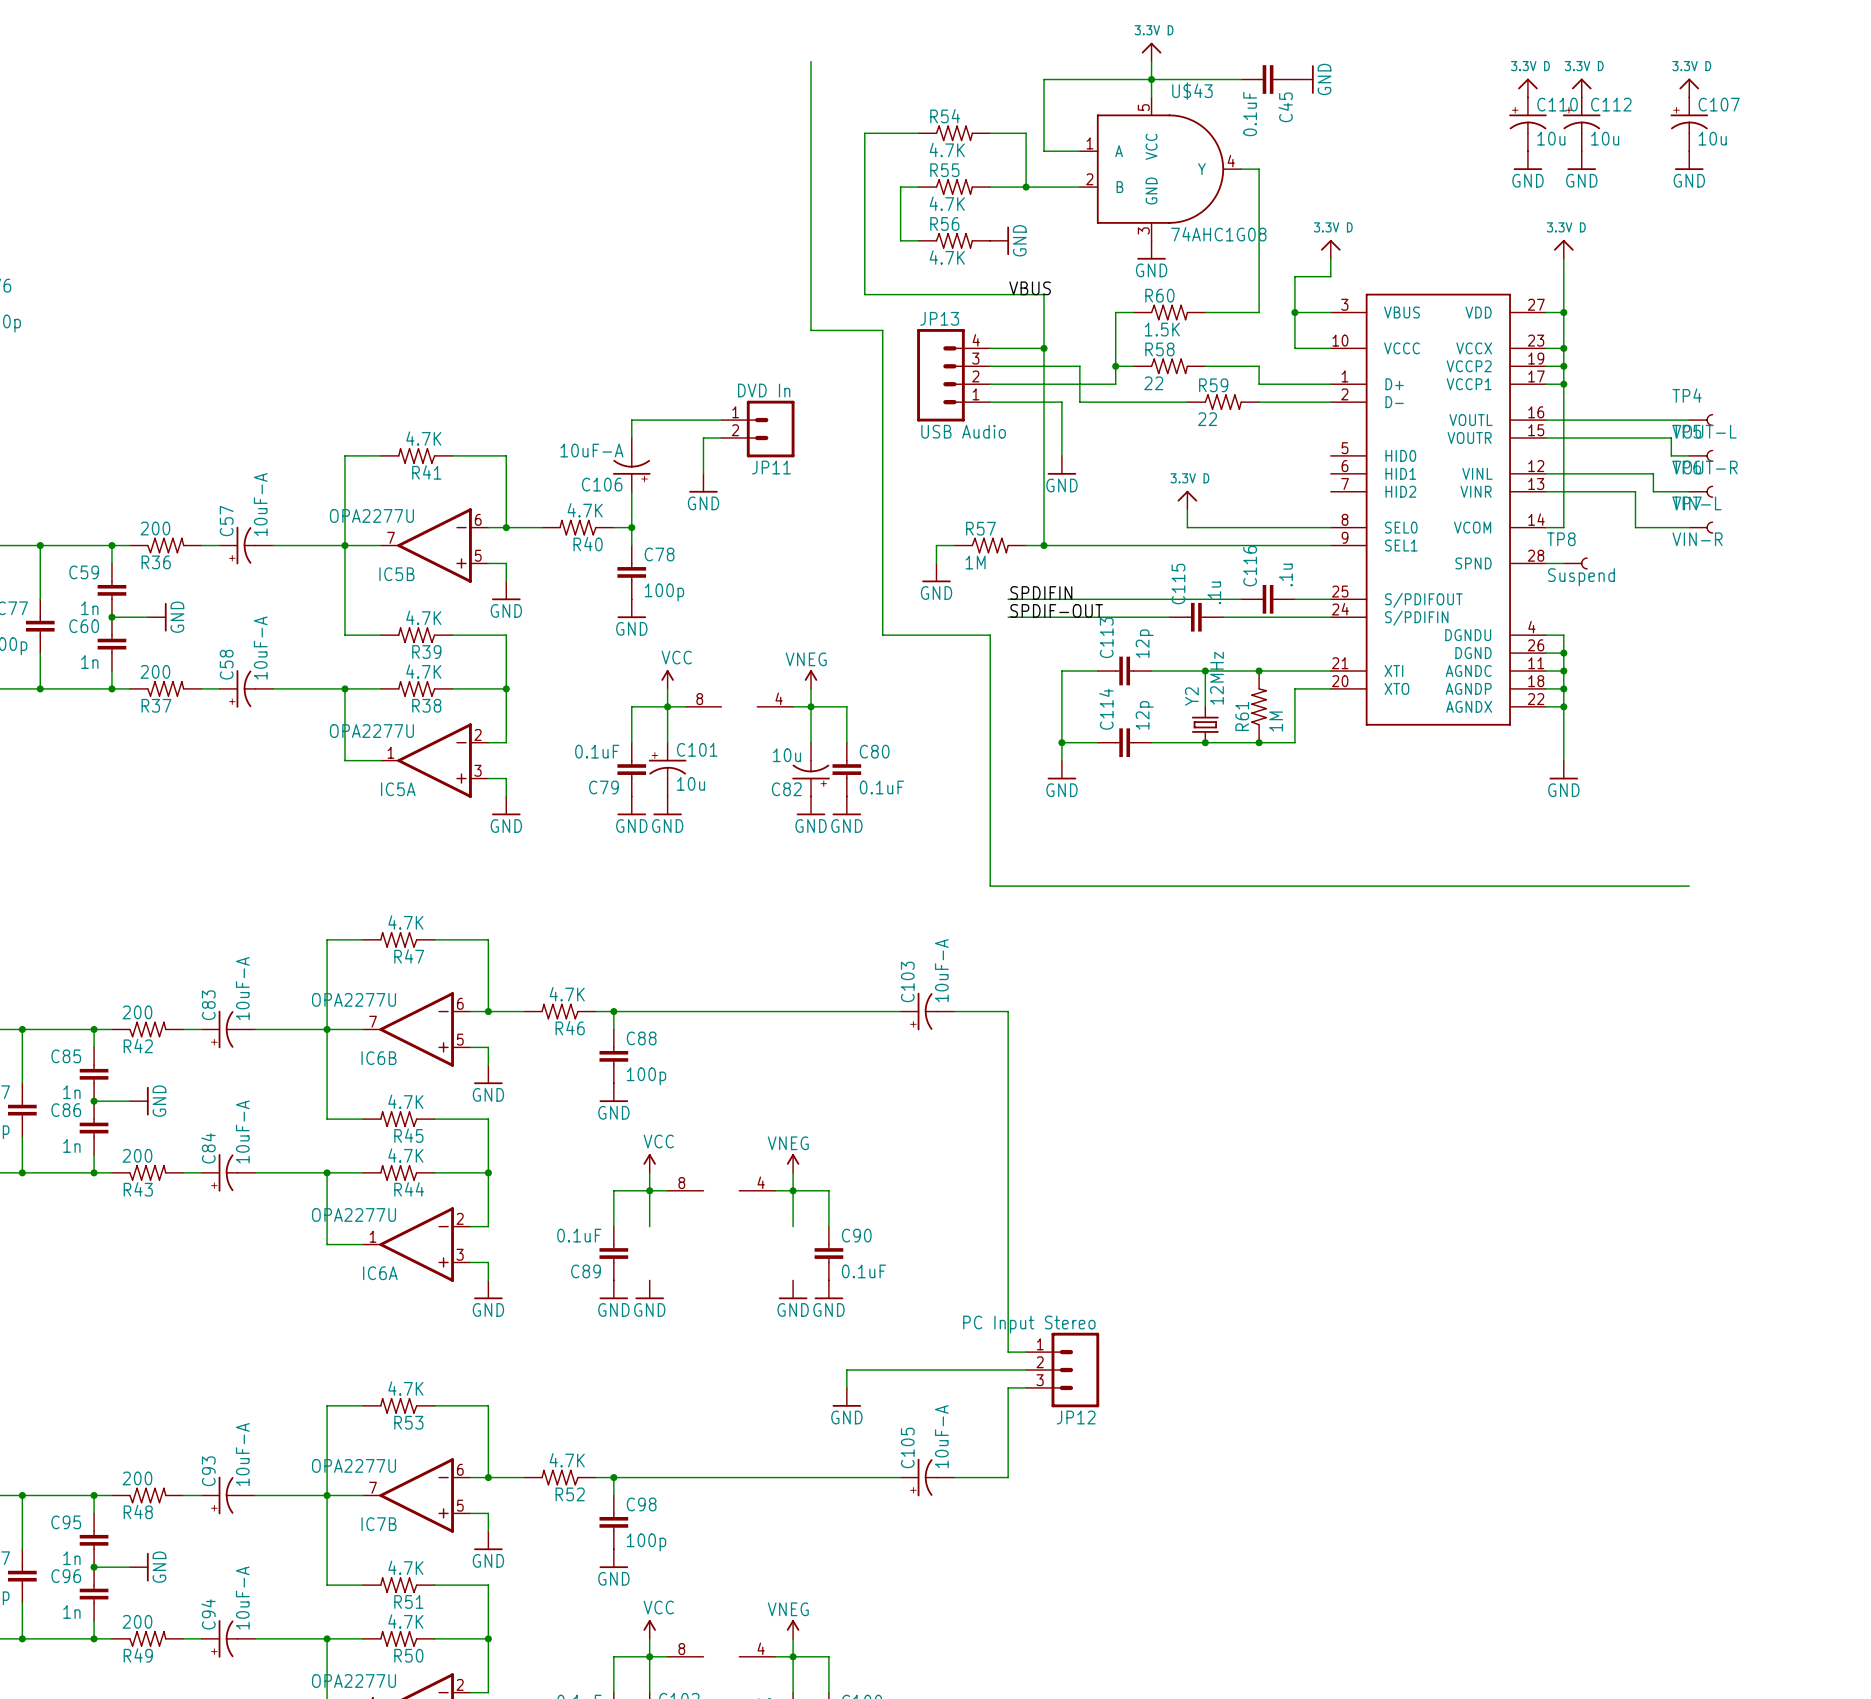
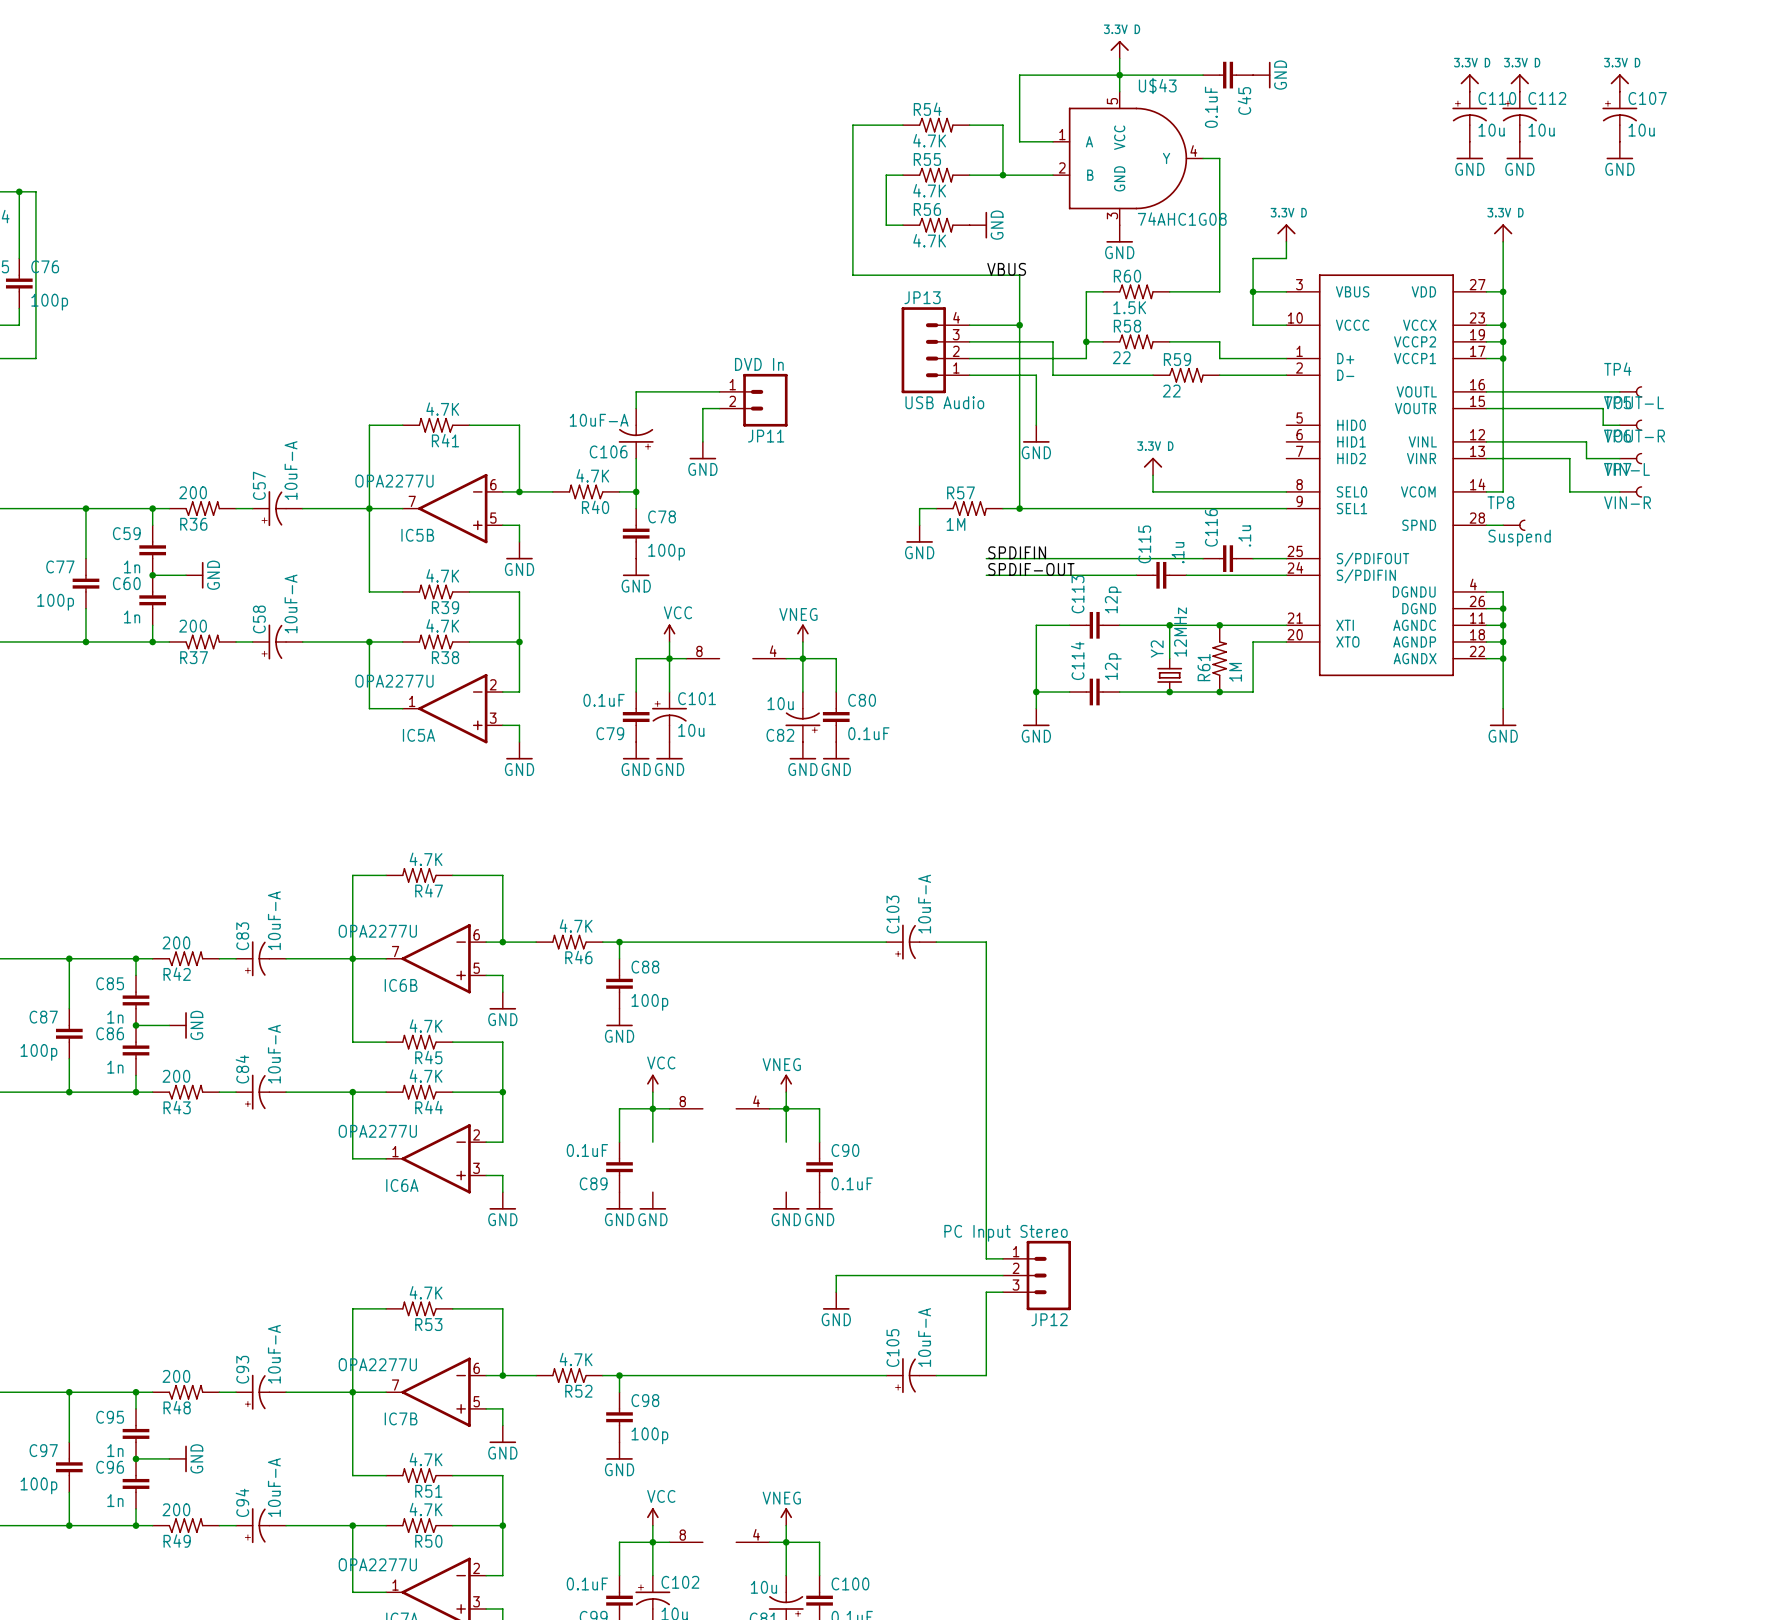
wire: (811, 61) (811, 330) (882, 330) (882, 635) (990, 635) (990, 886) (1689, 886) -> none

